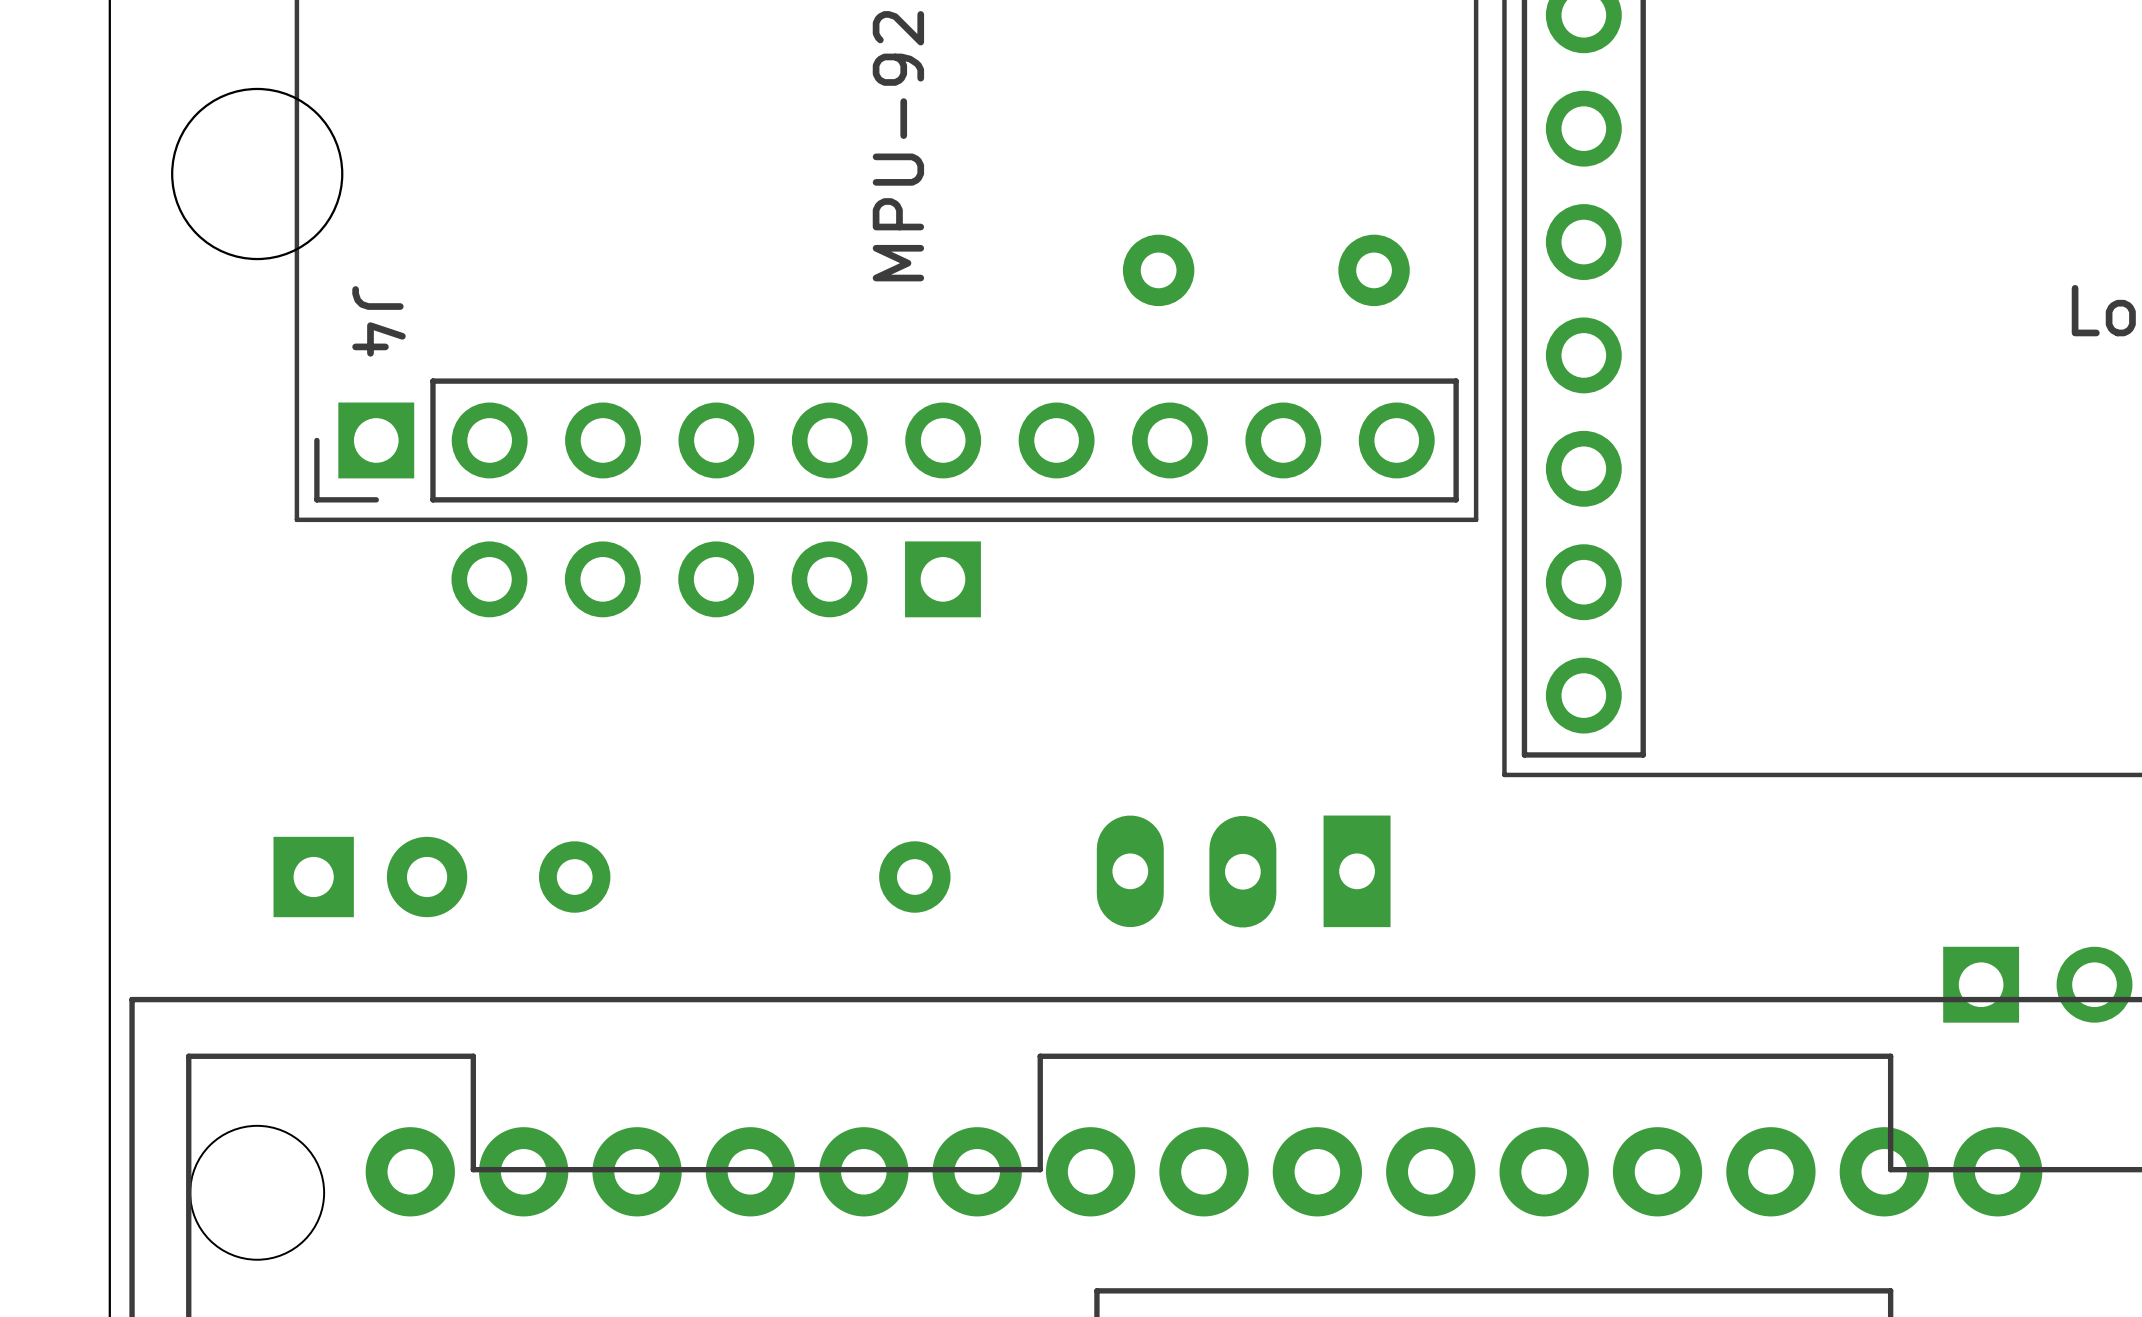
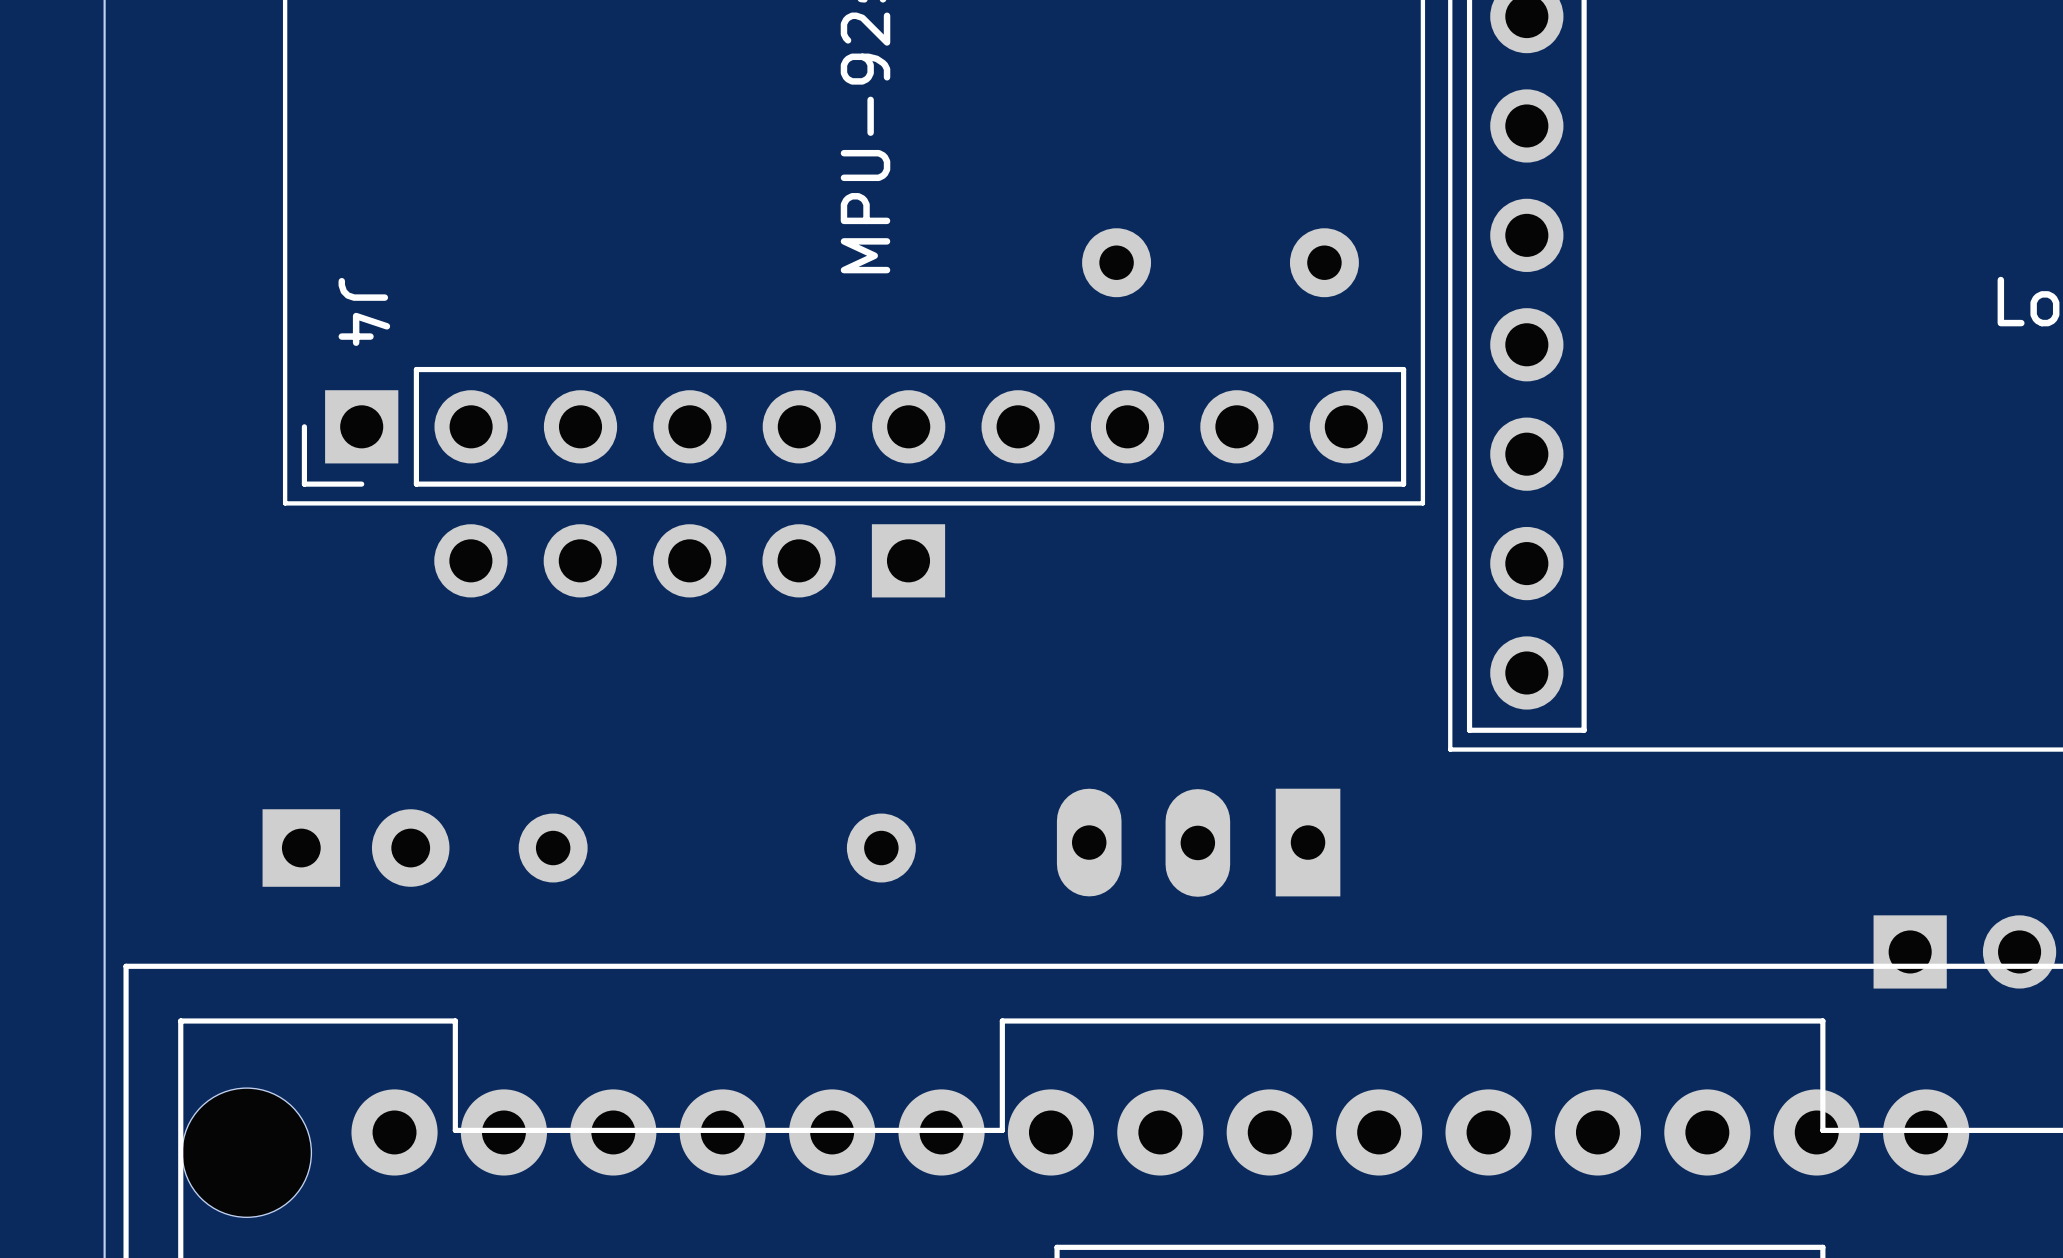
round board edge: [171, 87, 344, 261] -> none

